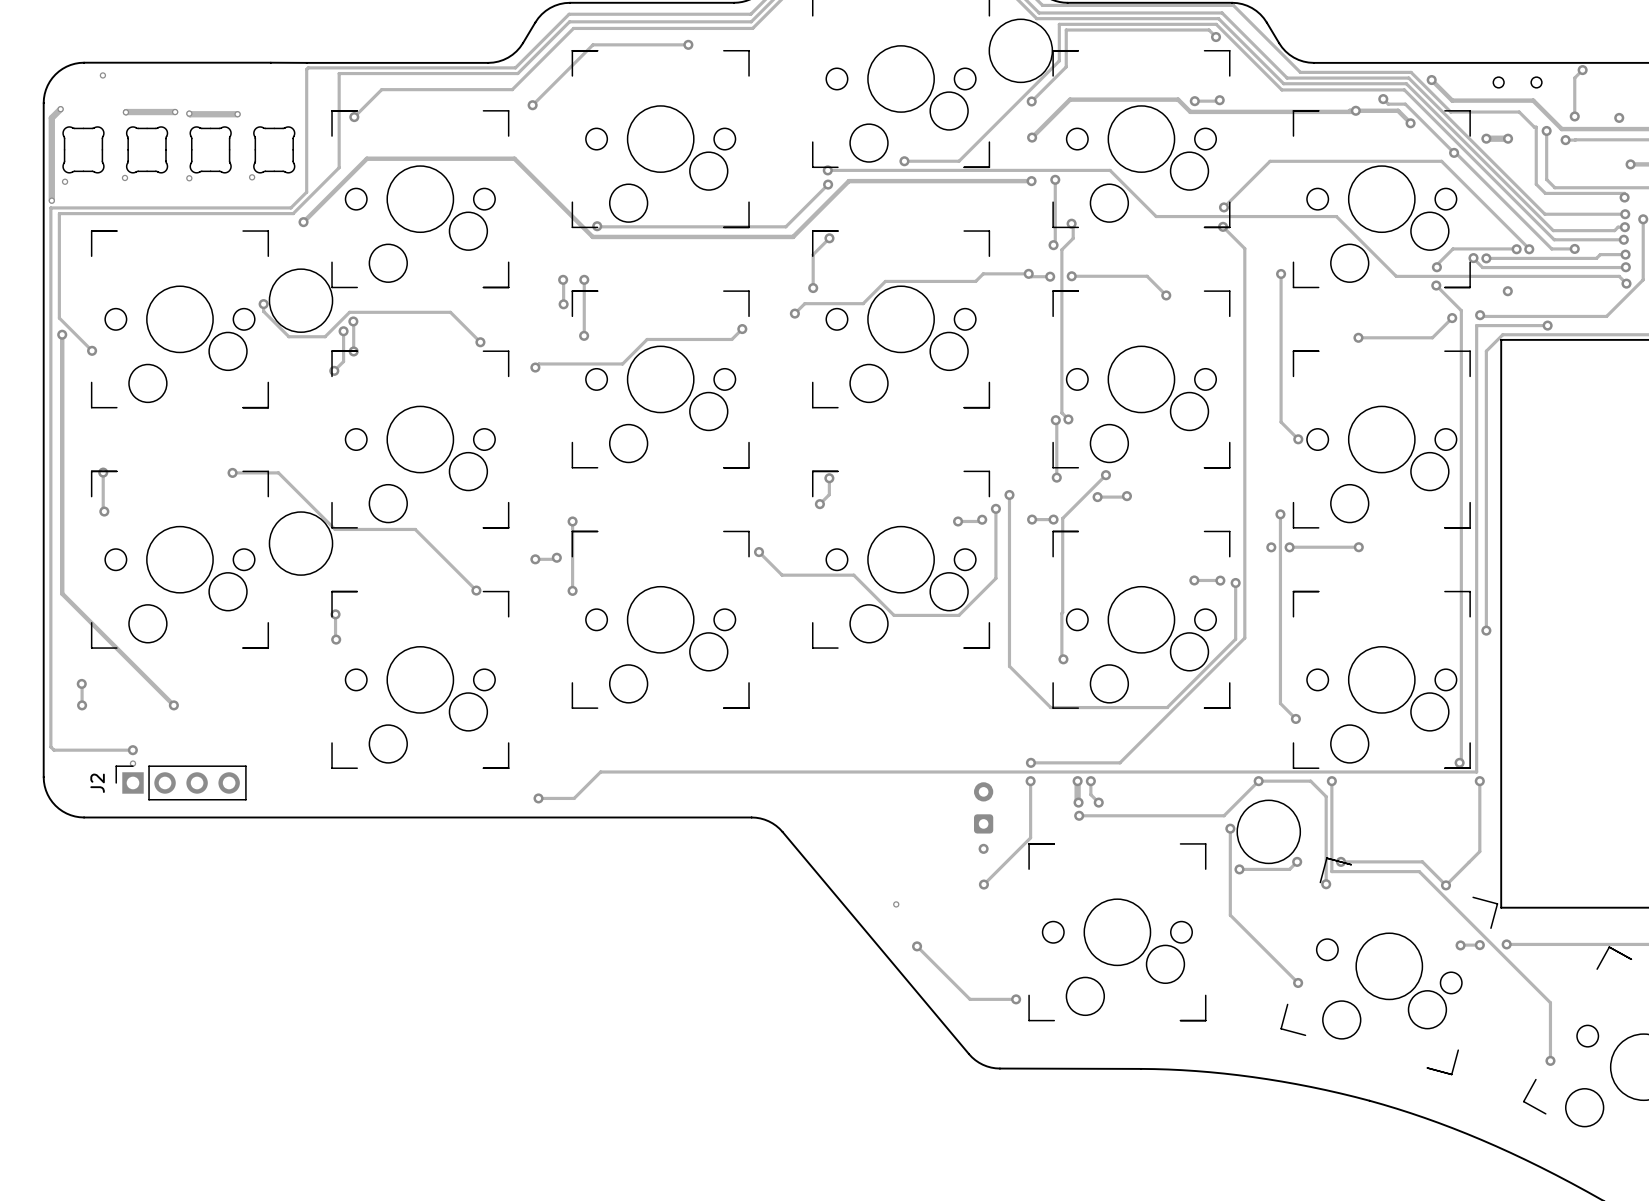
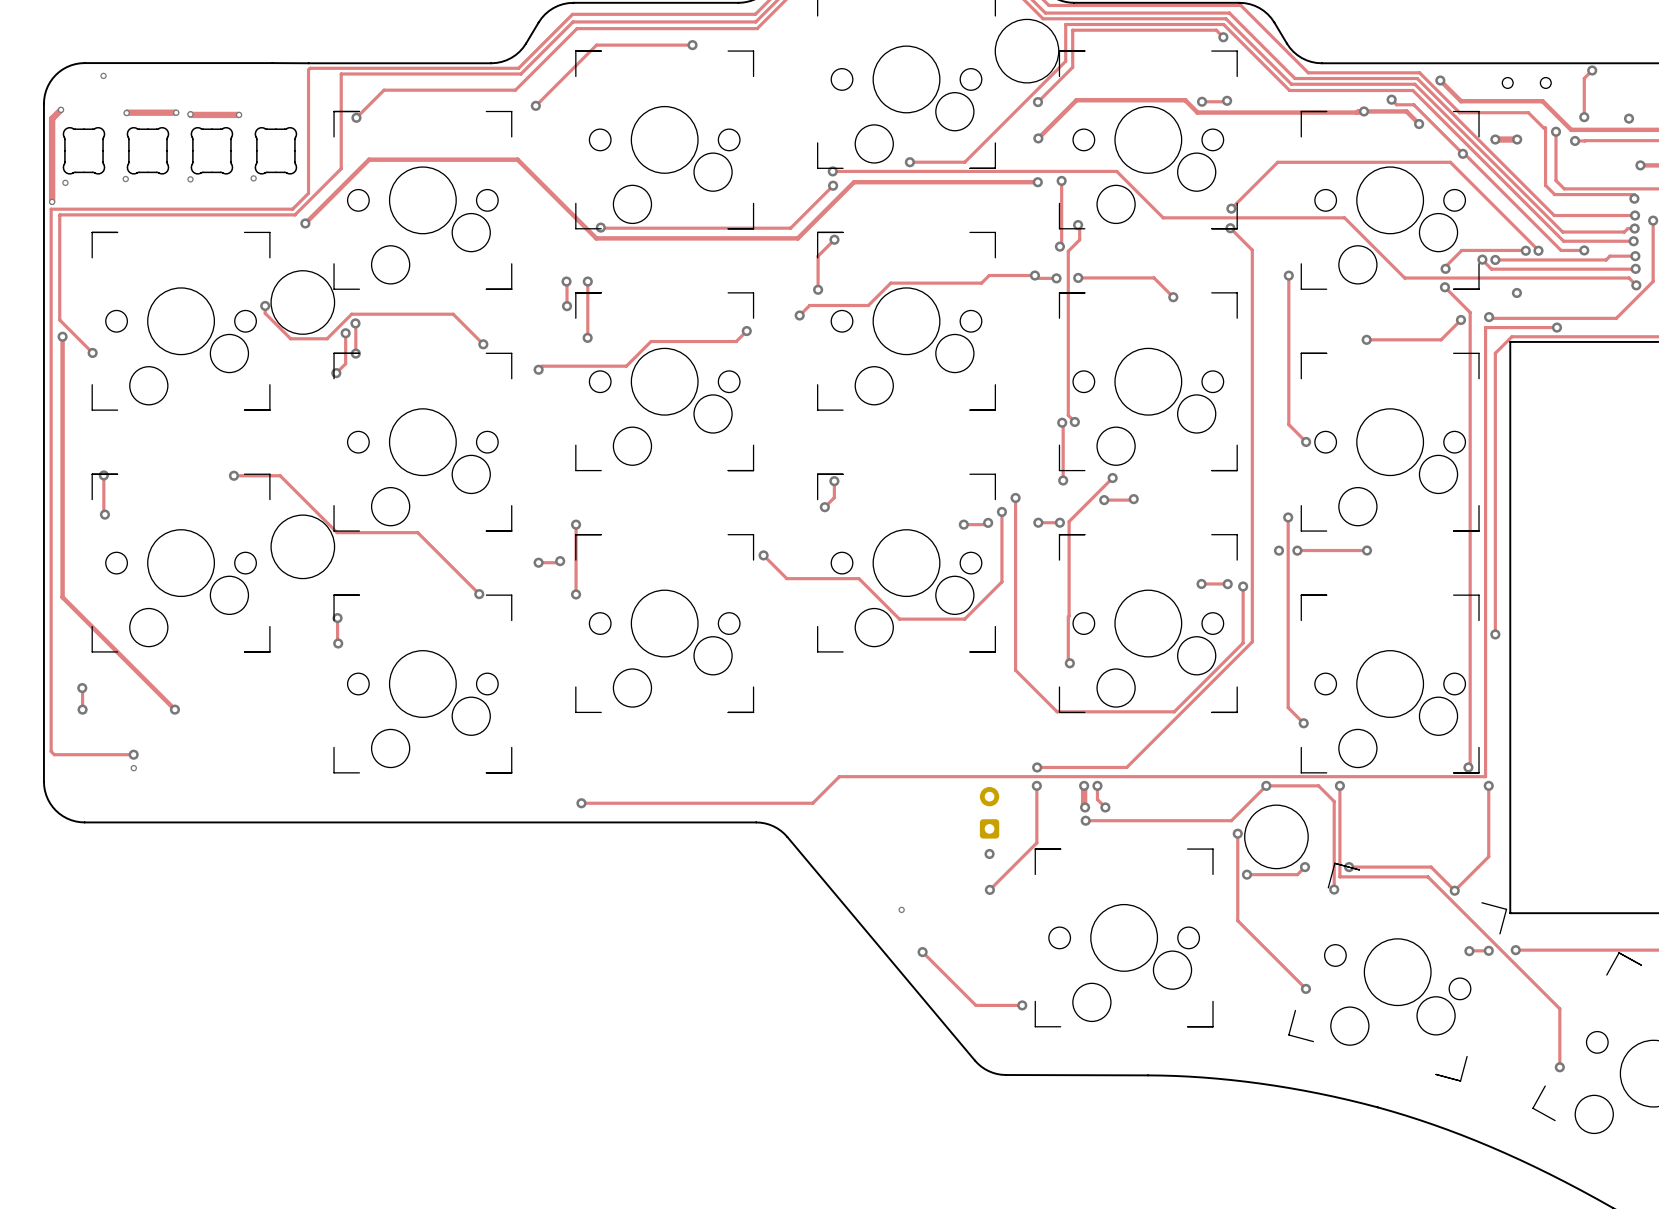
track: (834, 772) (600, 772) (574, 798) (538, 798) -> (839, 776) (812, 803) (581, 803)
J2: (181, 782) -> none
via position: (538, 798) -> (581, 803)

